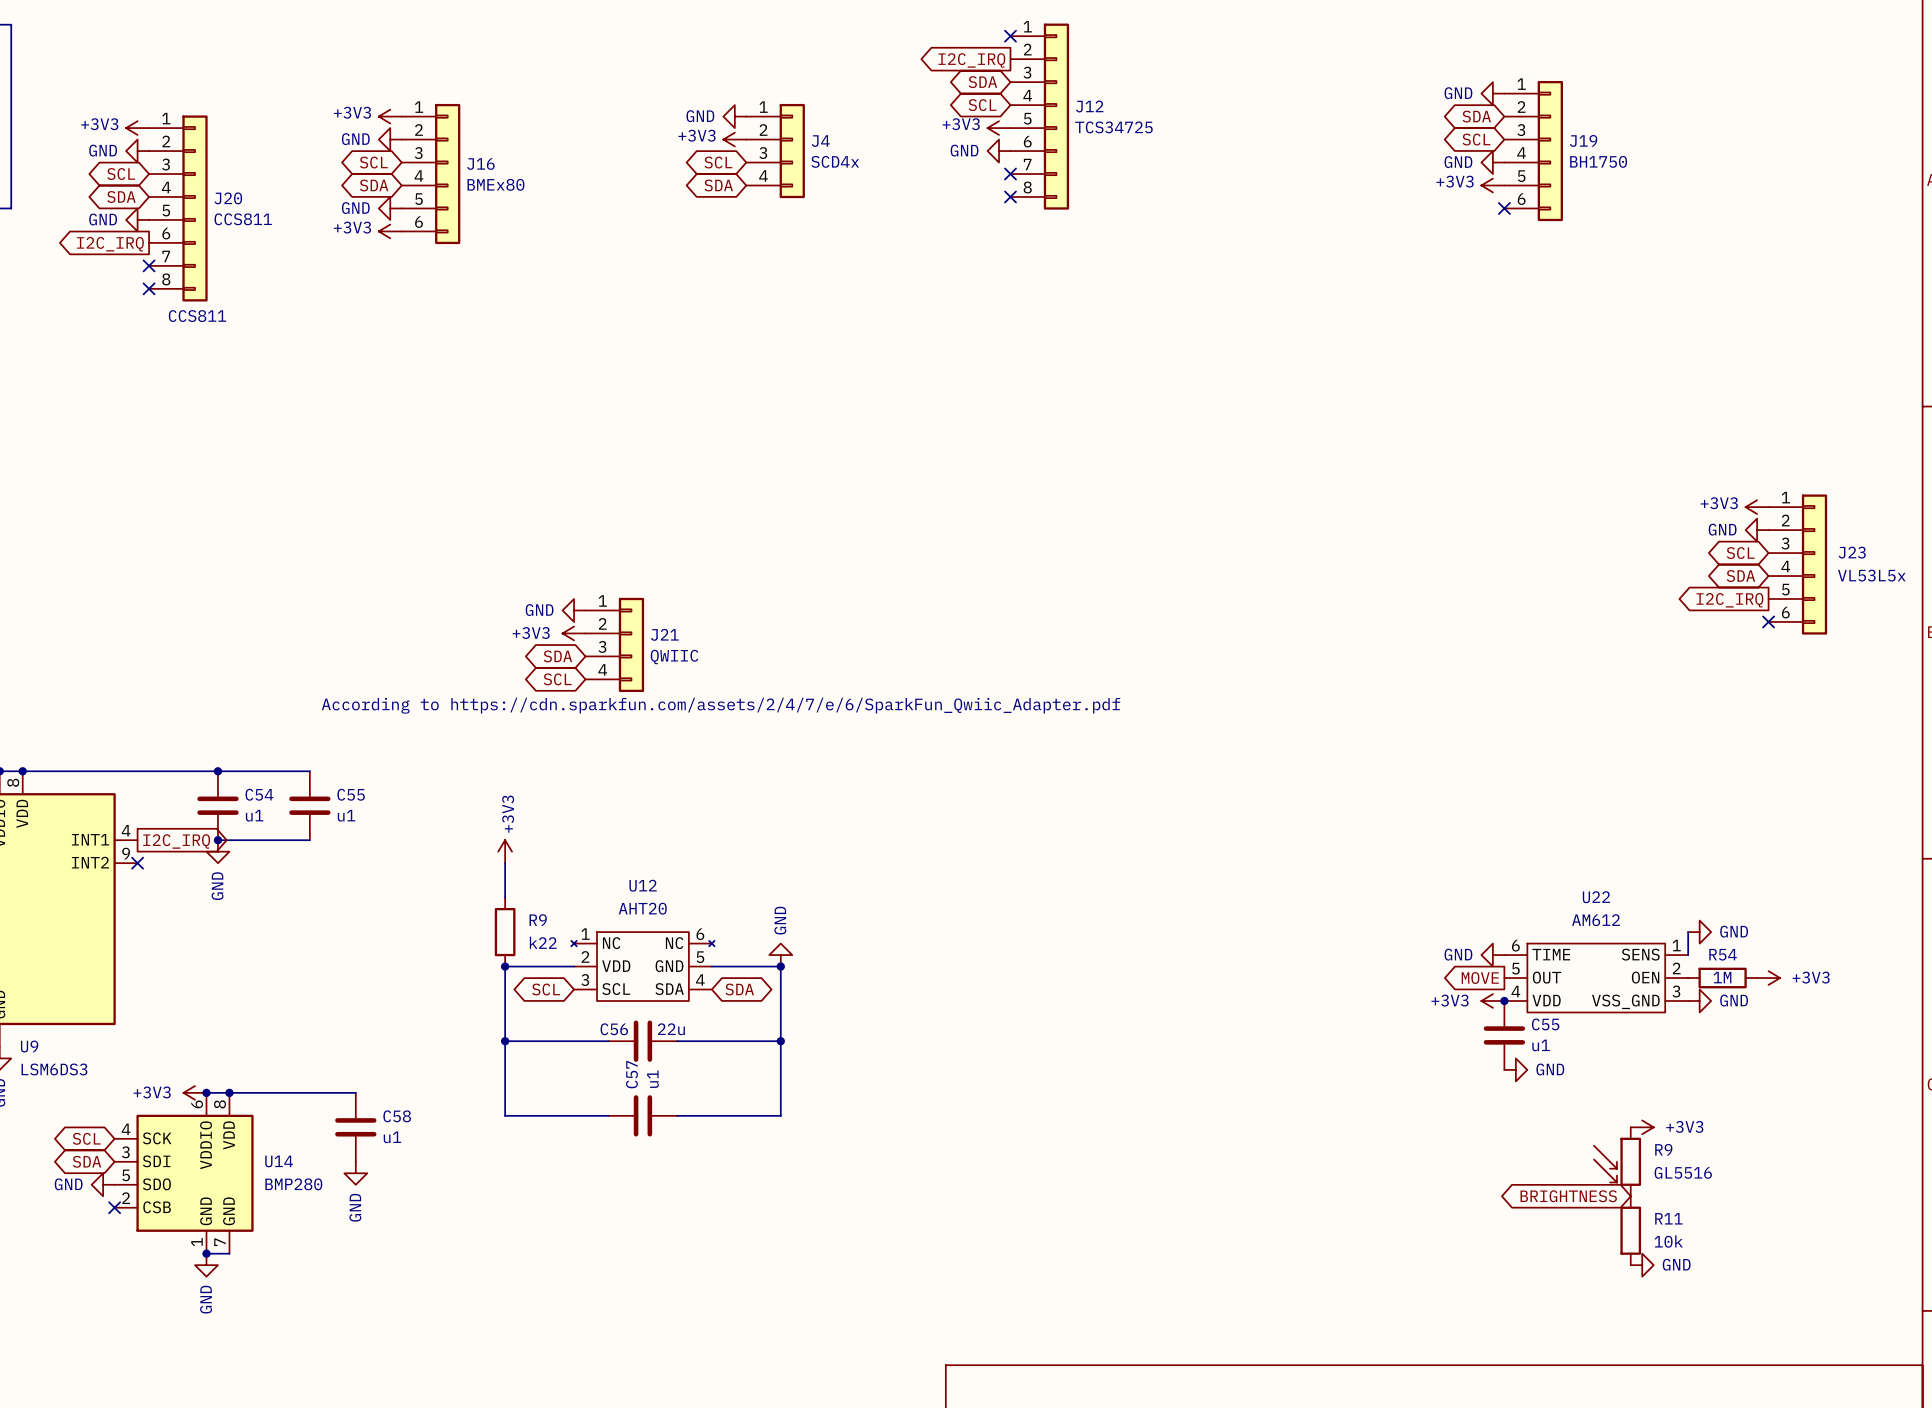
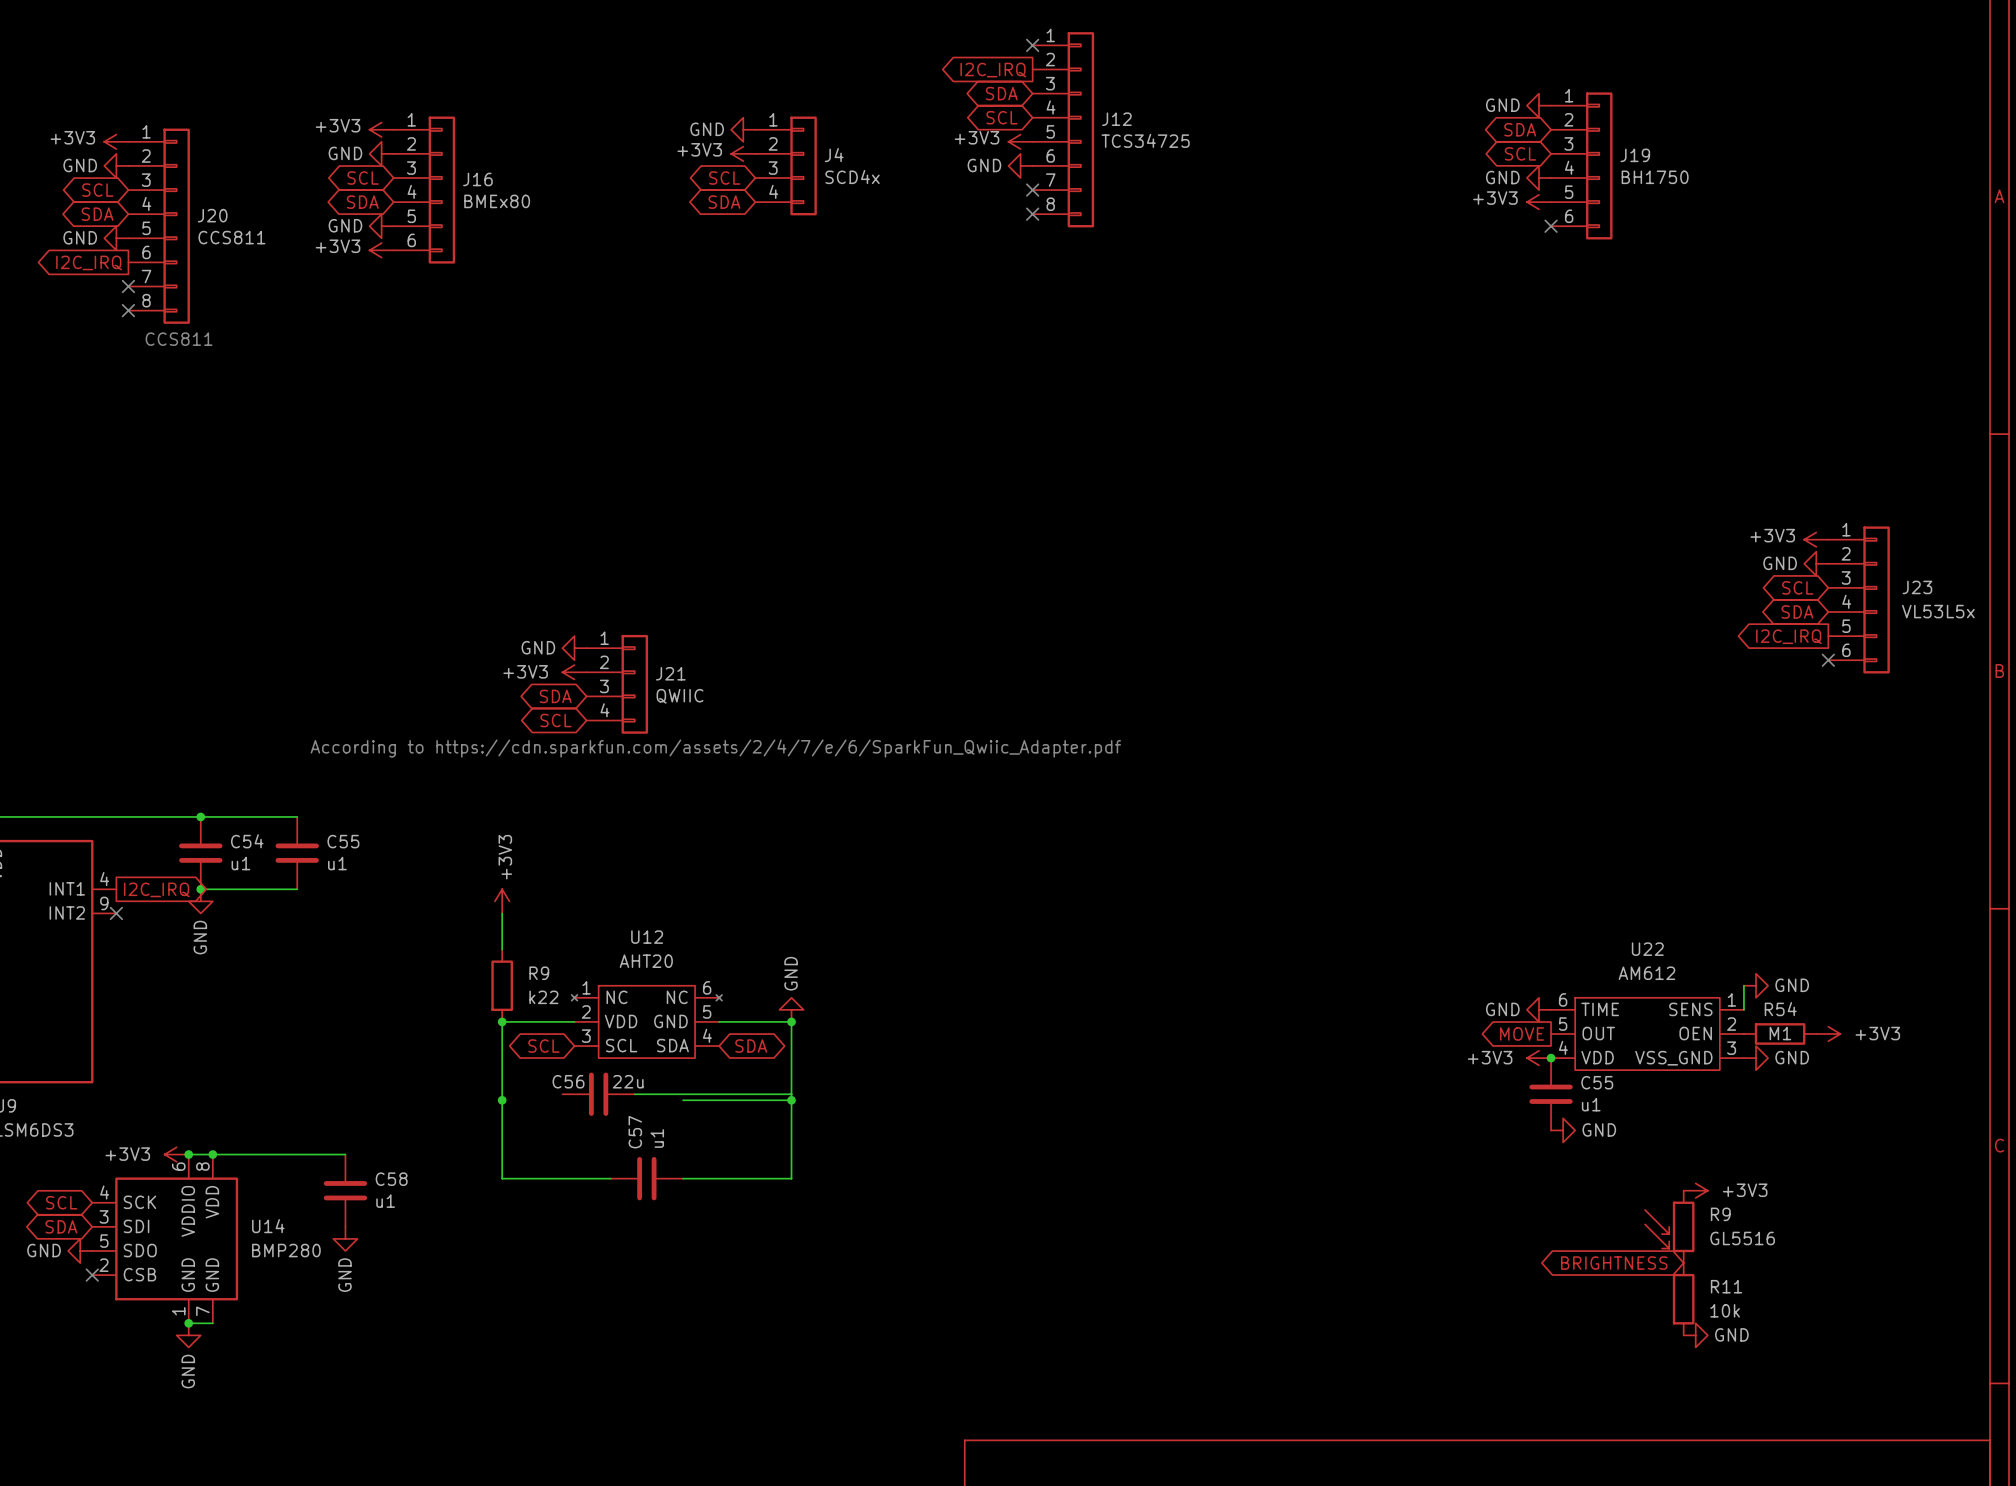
R54 value: 1M (1722, 977) -> M1 (1780, 1033)
wire: none -> (634, 1094) (791, 1094)
wire: (505, 1041) (608, 1041) -> none
C56 position: (642, 1041) -> (598, 1094)

